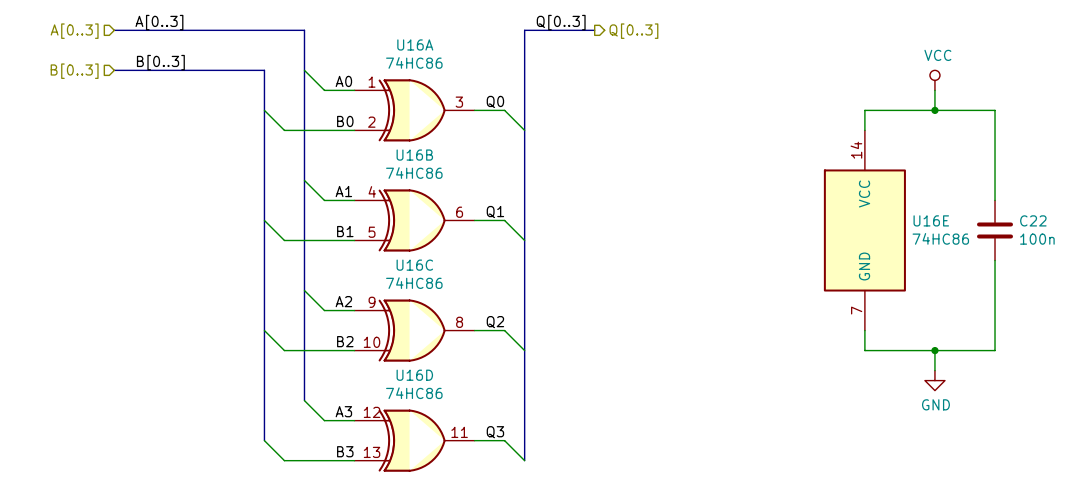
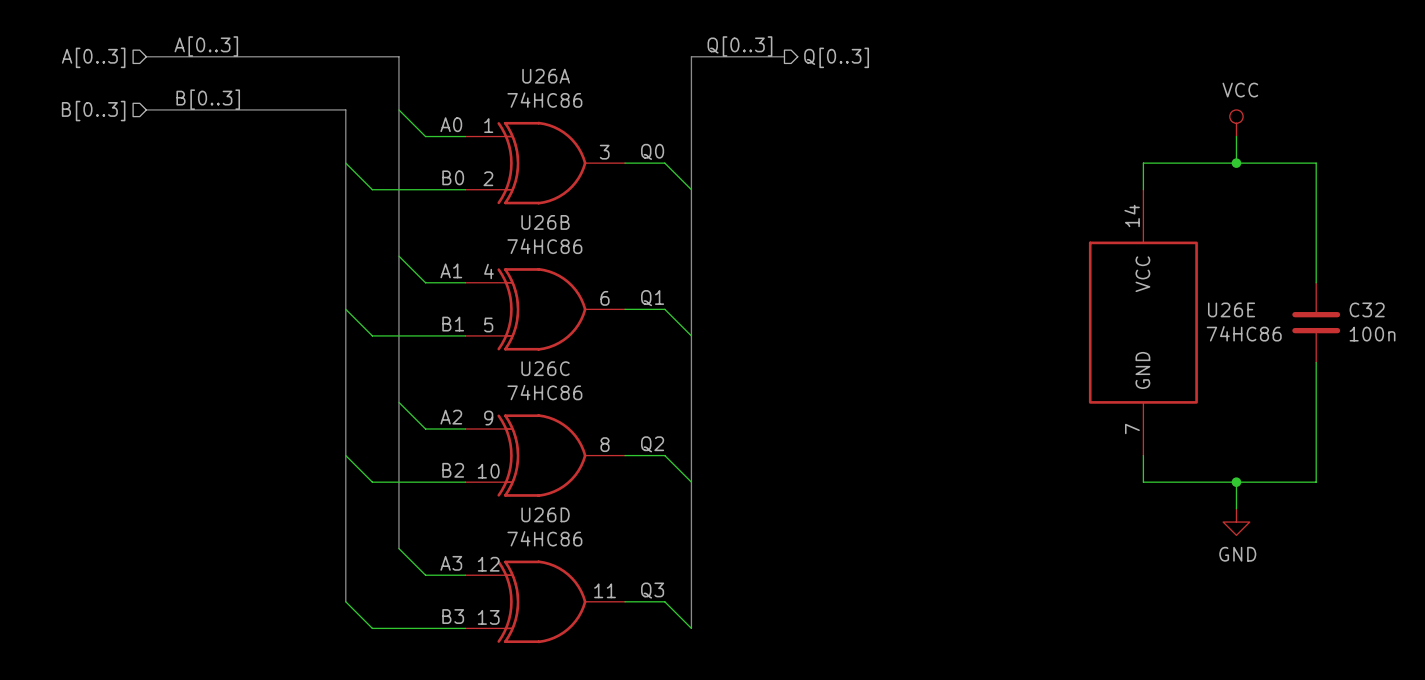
U16A name: U16A (415, 44) -> U26A (546, 76)
U16B name: U16B (414, 155) -> U26B (545, 222)
U16E name: U16E (931, 220) -> U26E (1231, 309)
C22 name: C22 (1033, 220) -> C32 (1367, 309)
U16C name: U16C (414, 265) -> U26C (545, 368)
U16D name: U16D (414, 375) -> U26D (545, 514)

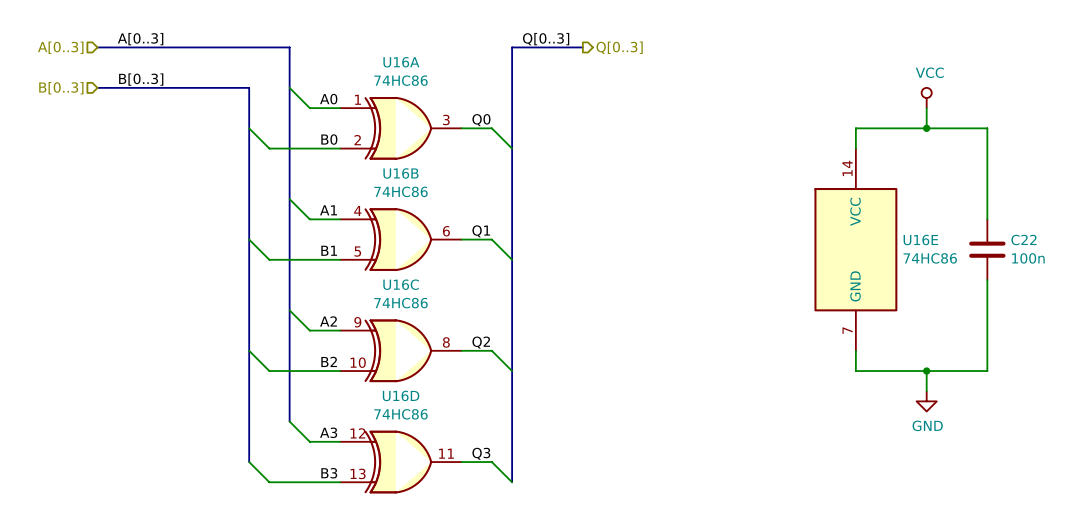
U26A name: U26A (546, 76) -> U16A (401, 62)
U26B name: U26B (545, 222) -> U16B (400, 173)
U26E name: U26E (1231, 309) -> U16E (920, 240)
C32 name: C32 (1367, 309) -> C22 (1023, 240)
U26C name: U26C (545, 368) -> U16C (401, 284)
U26D name: U26D (545, 514) -> U16D (401, 395)

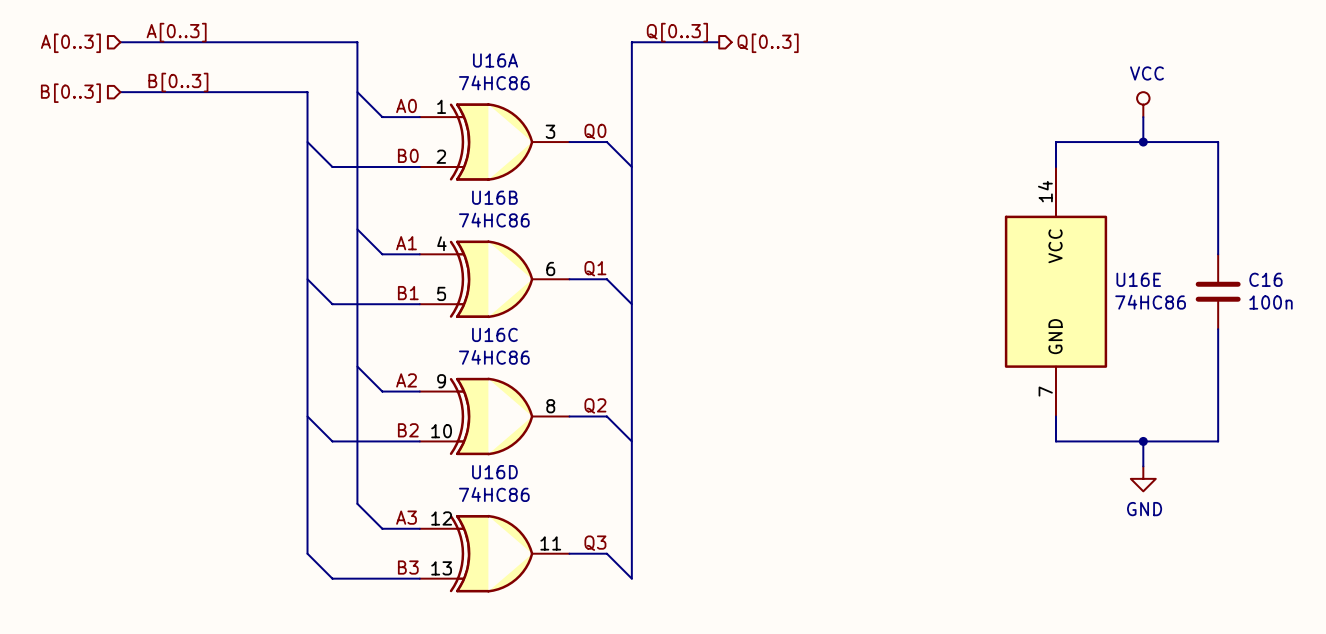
C22 name: C22 (1023, 240) -> C16 (1265, 279)

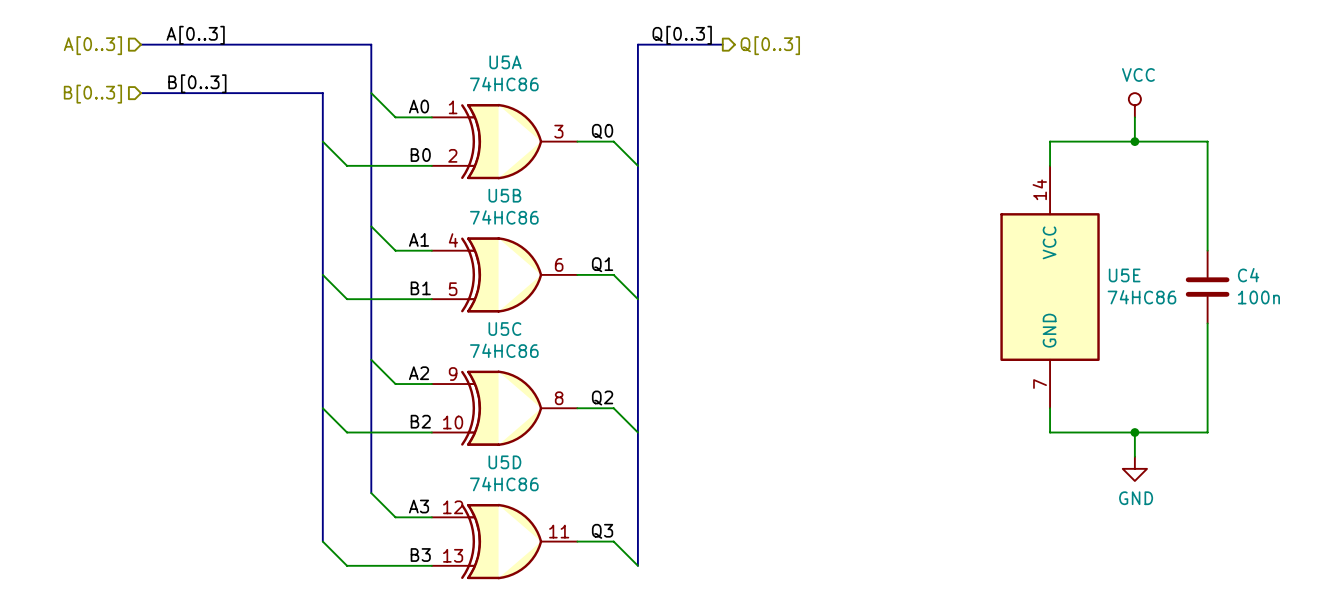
U16A name: U16A (495, 60) -> U5A (505, 62)
U16B name: U16B (494, 197) -> U5B (504, 195)
U16E name: U16E (1138, 279) -> U5E (1124, 275)
C16 name: C16 (1265, 279) -> C4 (1248, 275)
U16C name: U16C (494, 334) -> U5C (504, 329)
U16D name: U16D (494, 472) -> U5D (504, 462)

